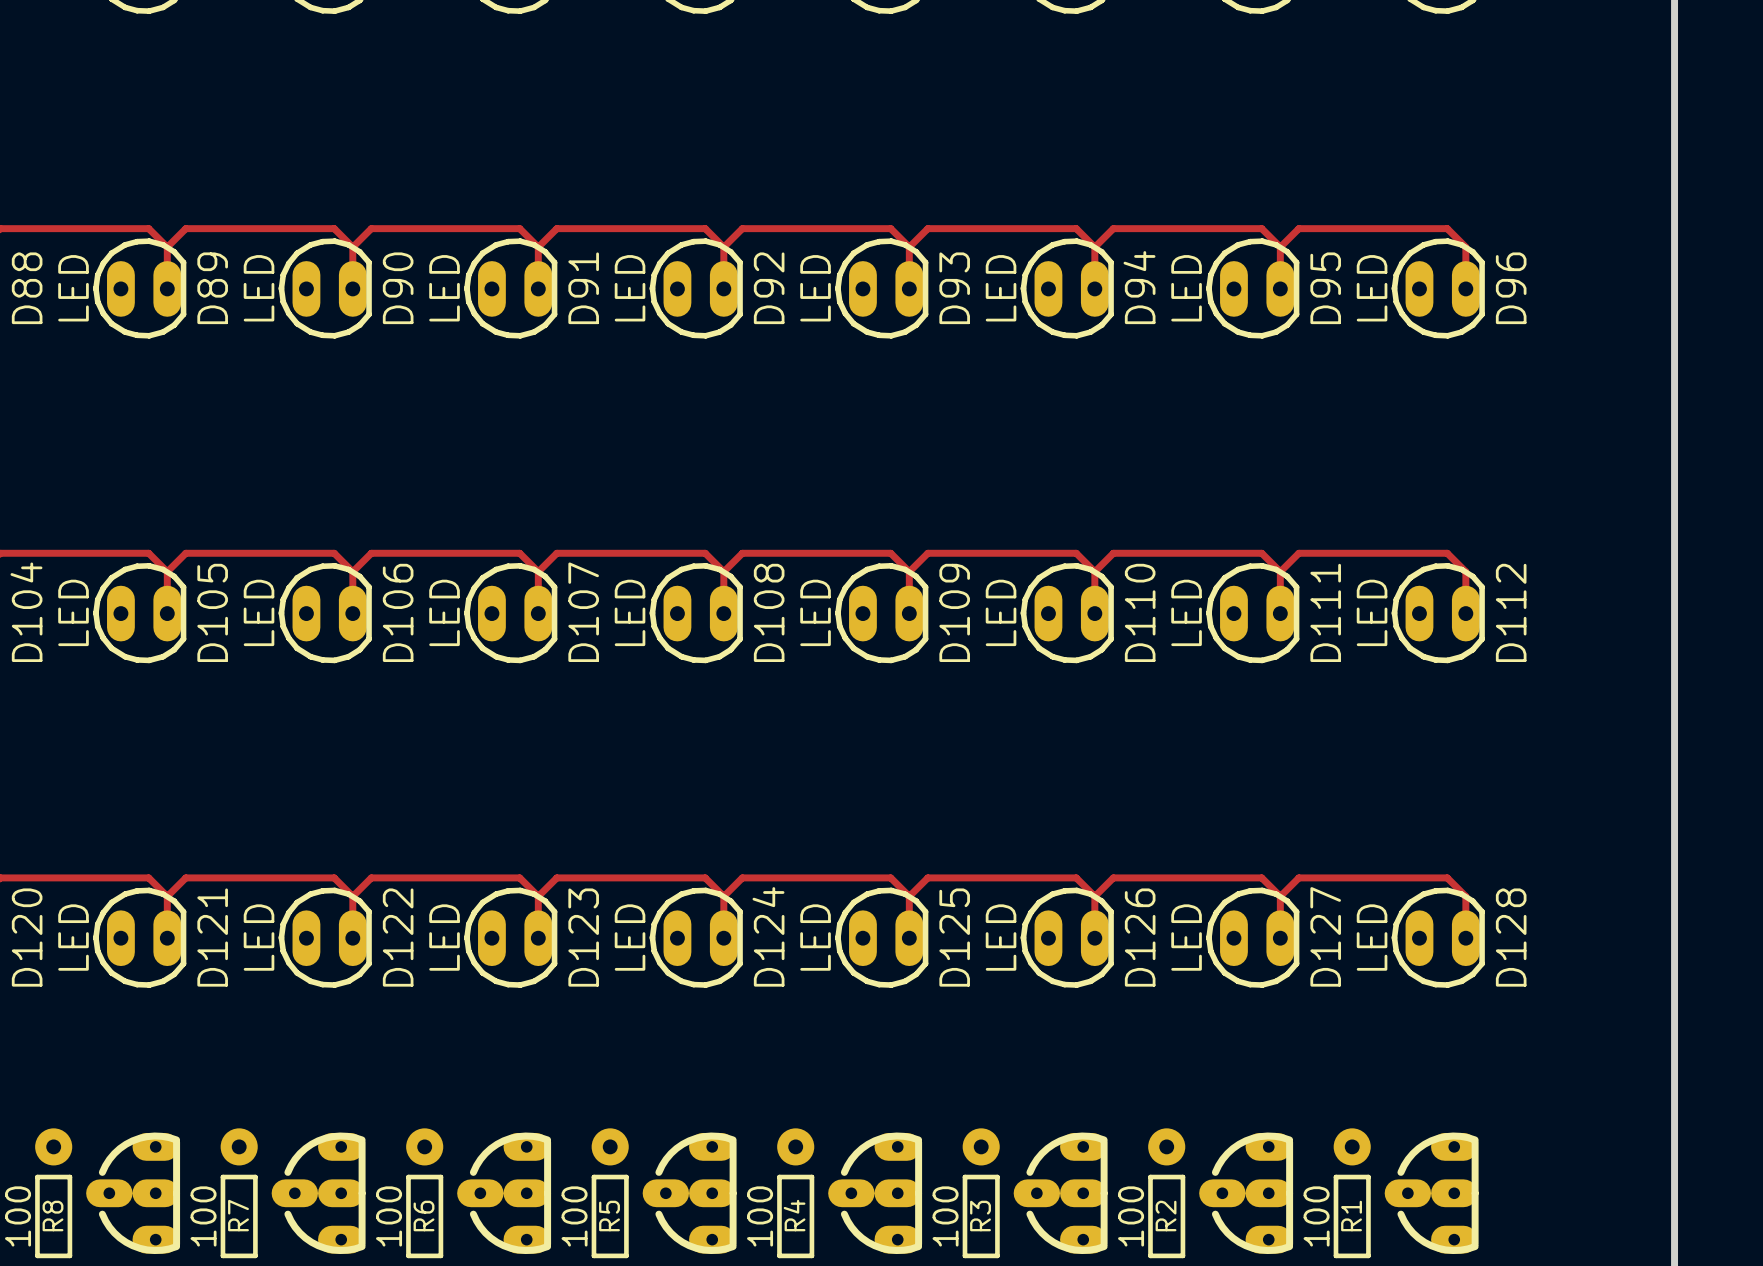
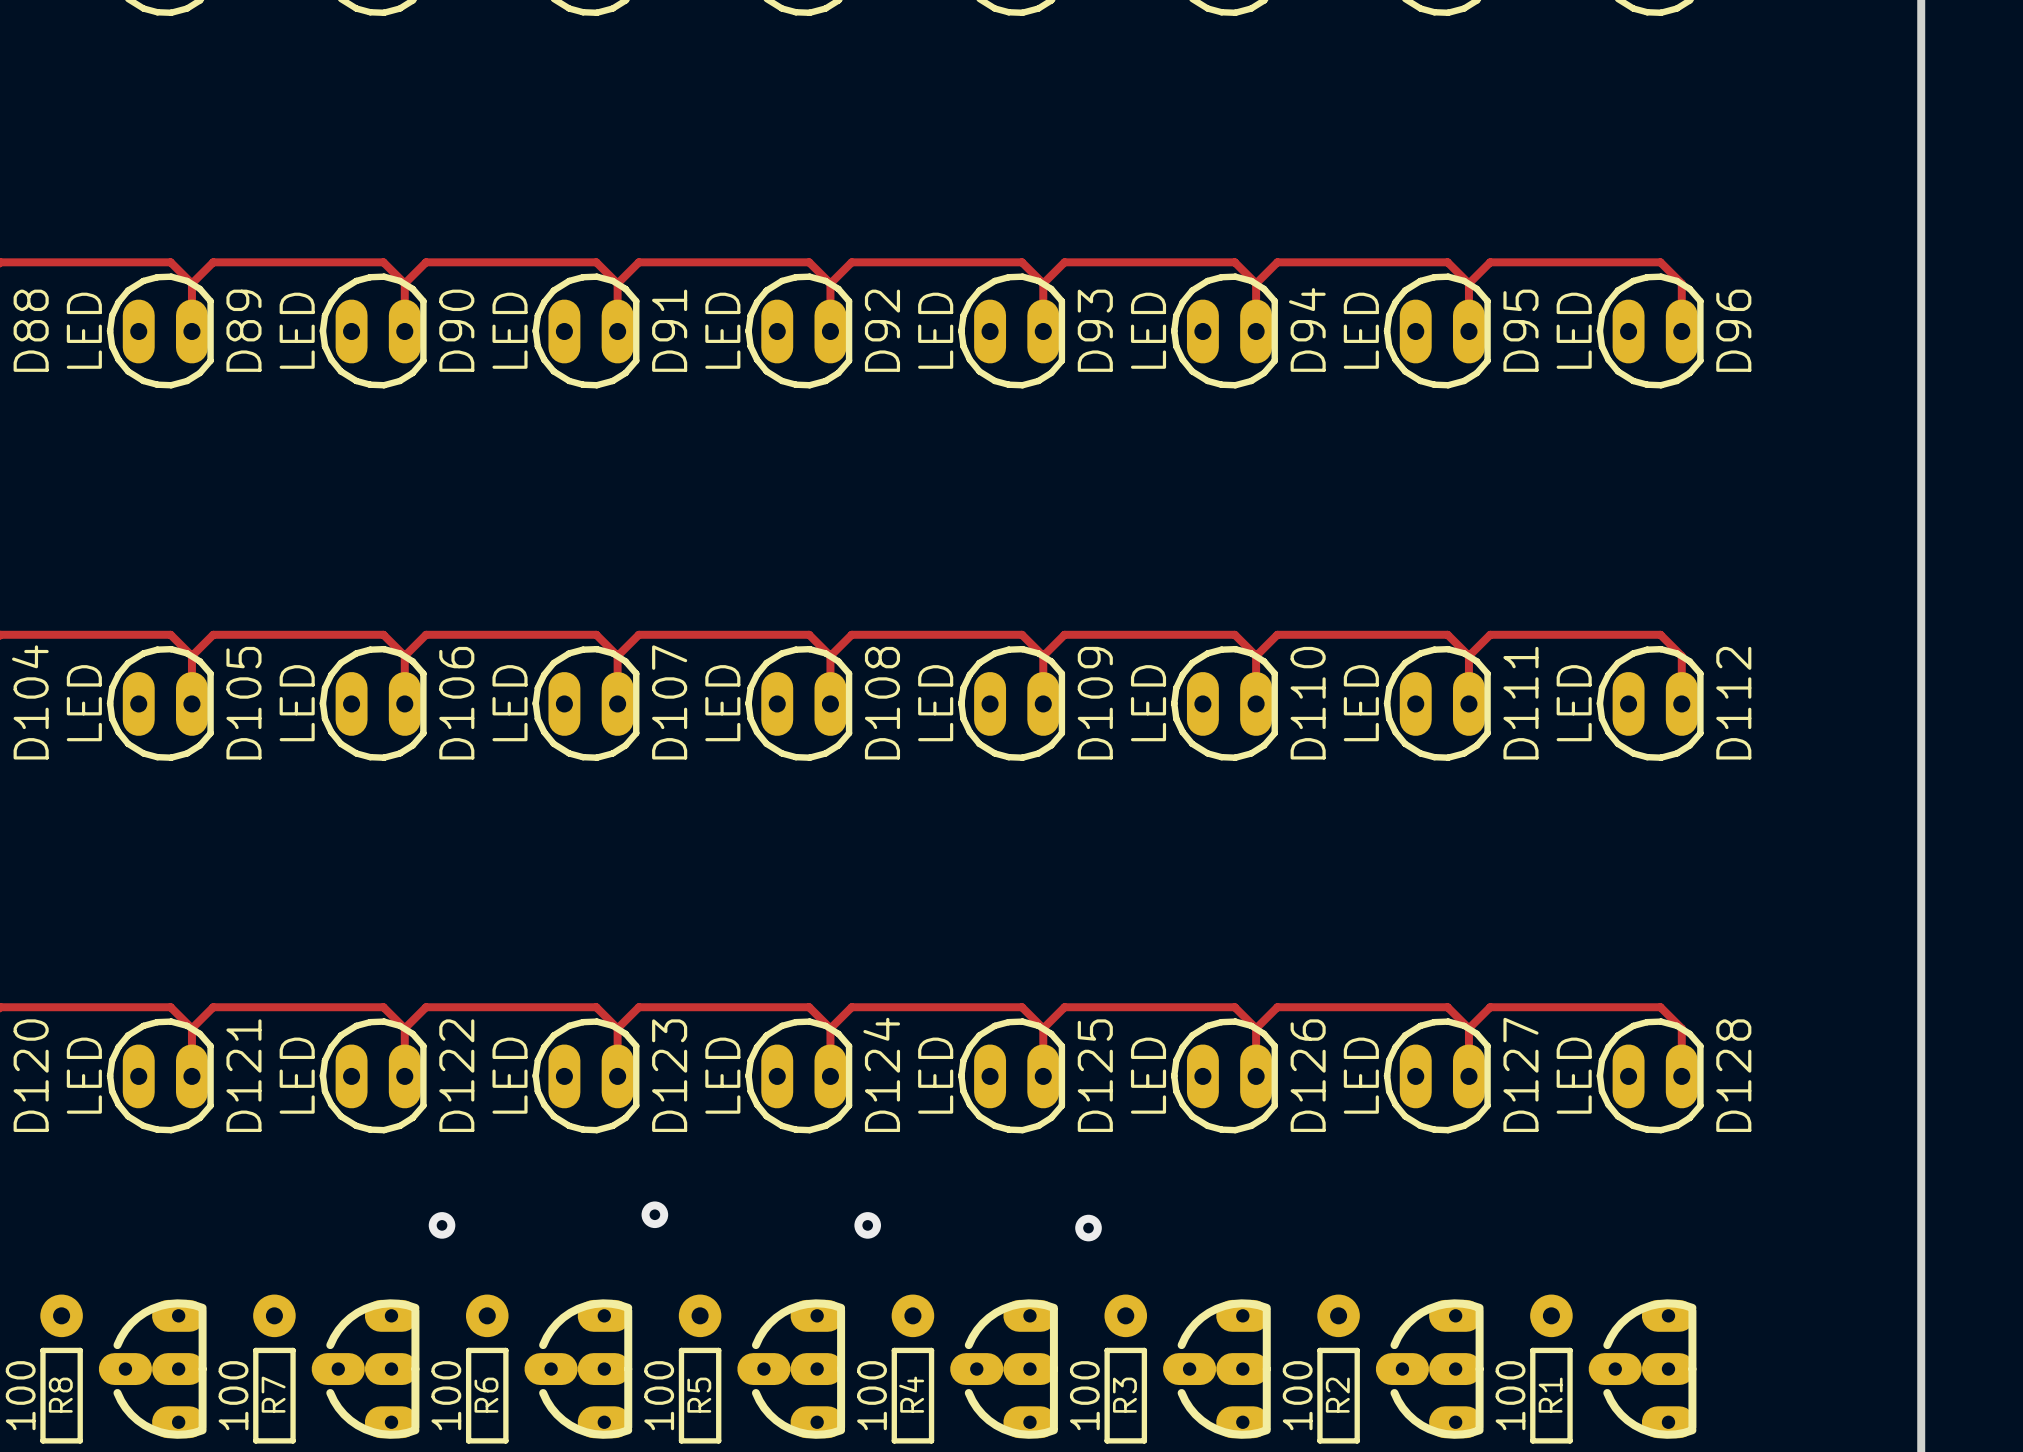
via: none -> (654, 1214)
via: none -> (442, 1225)
via: none -> (867, 1225)
via: none -> (1088, 1228)

